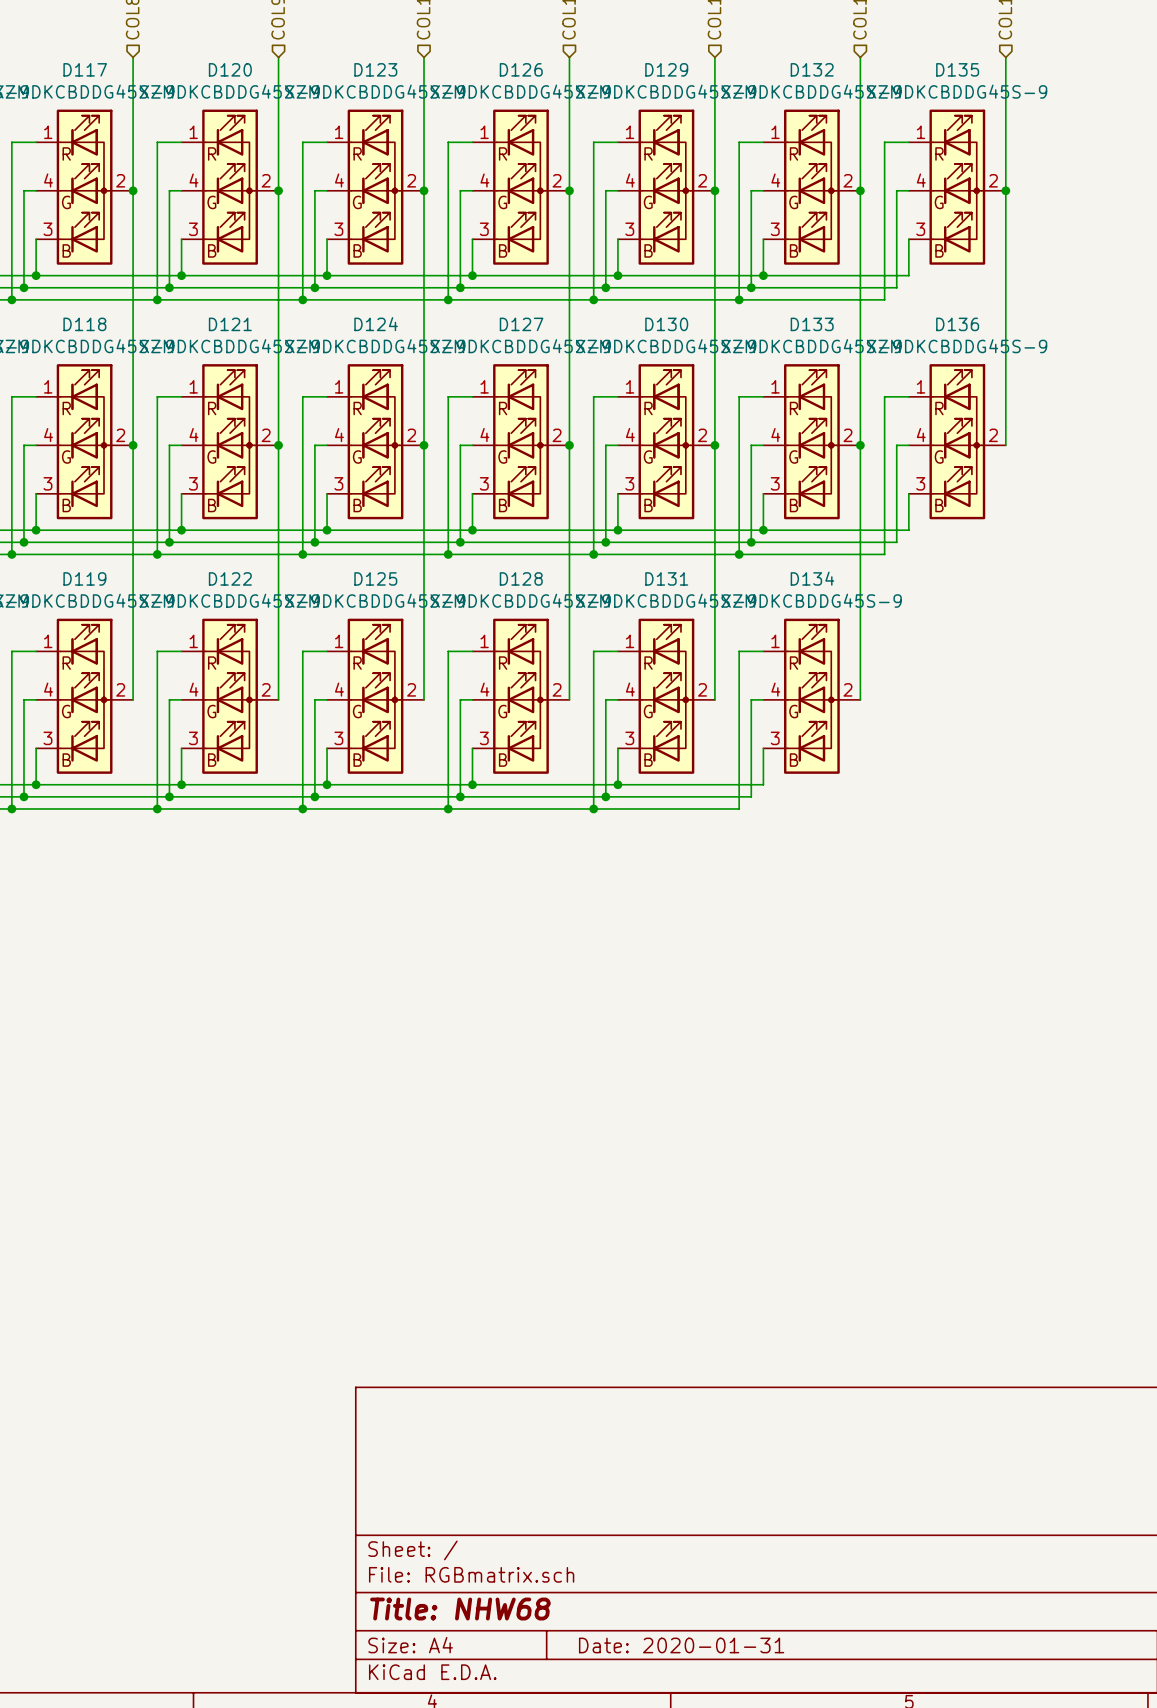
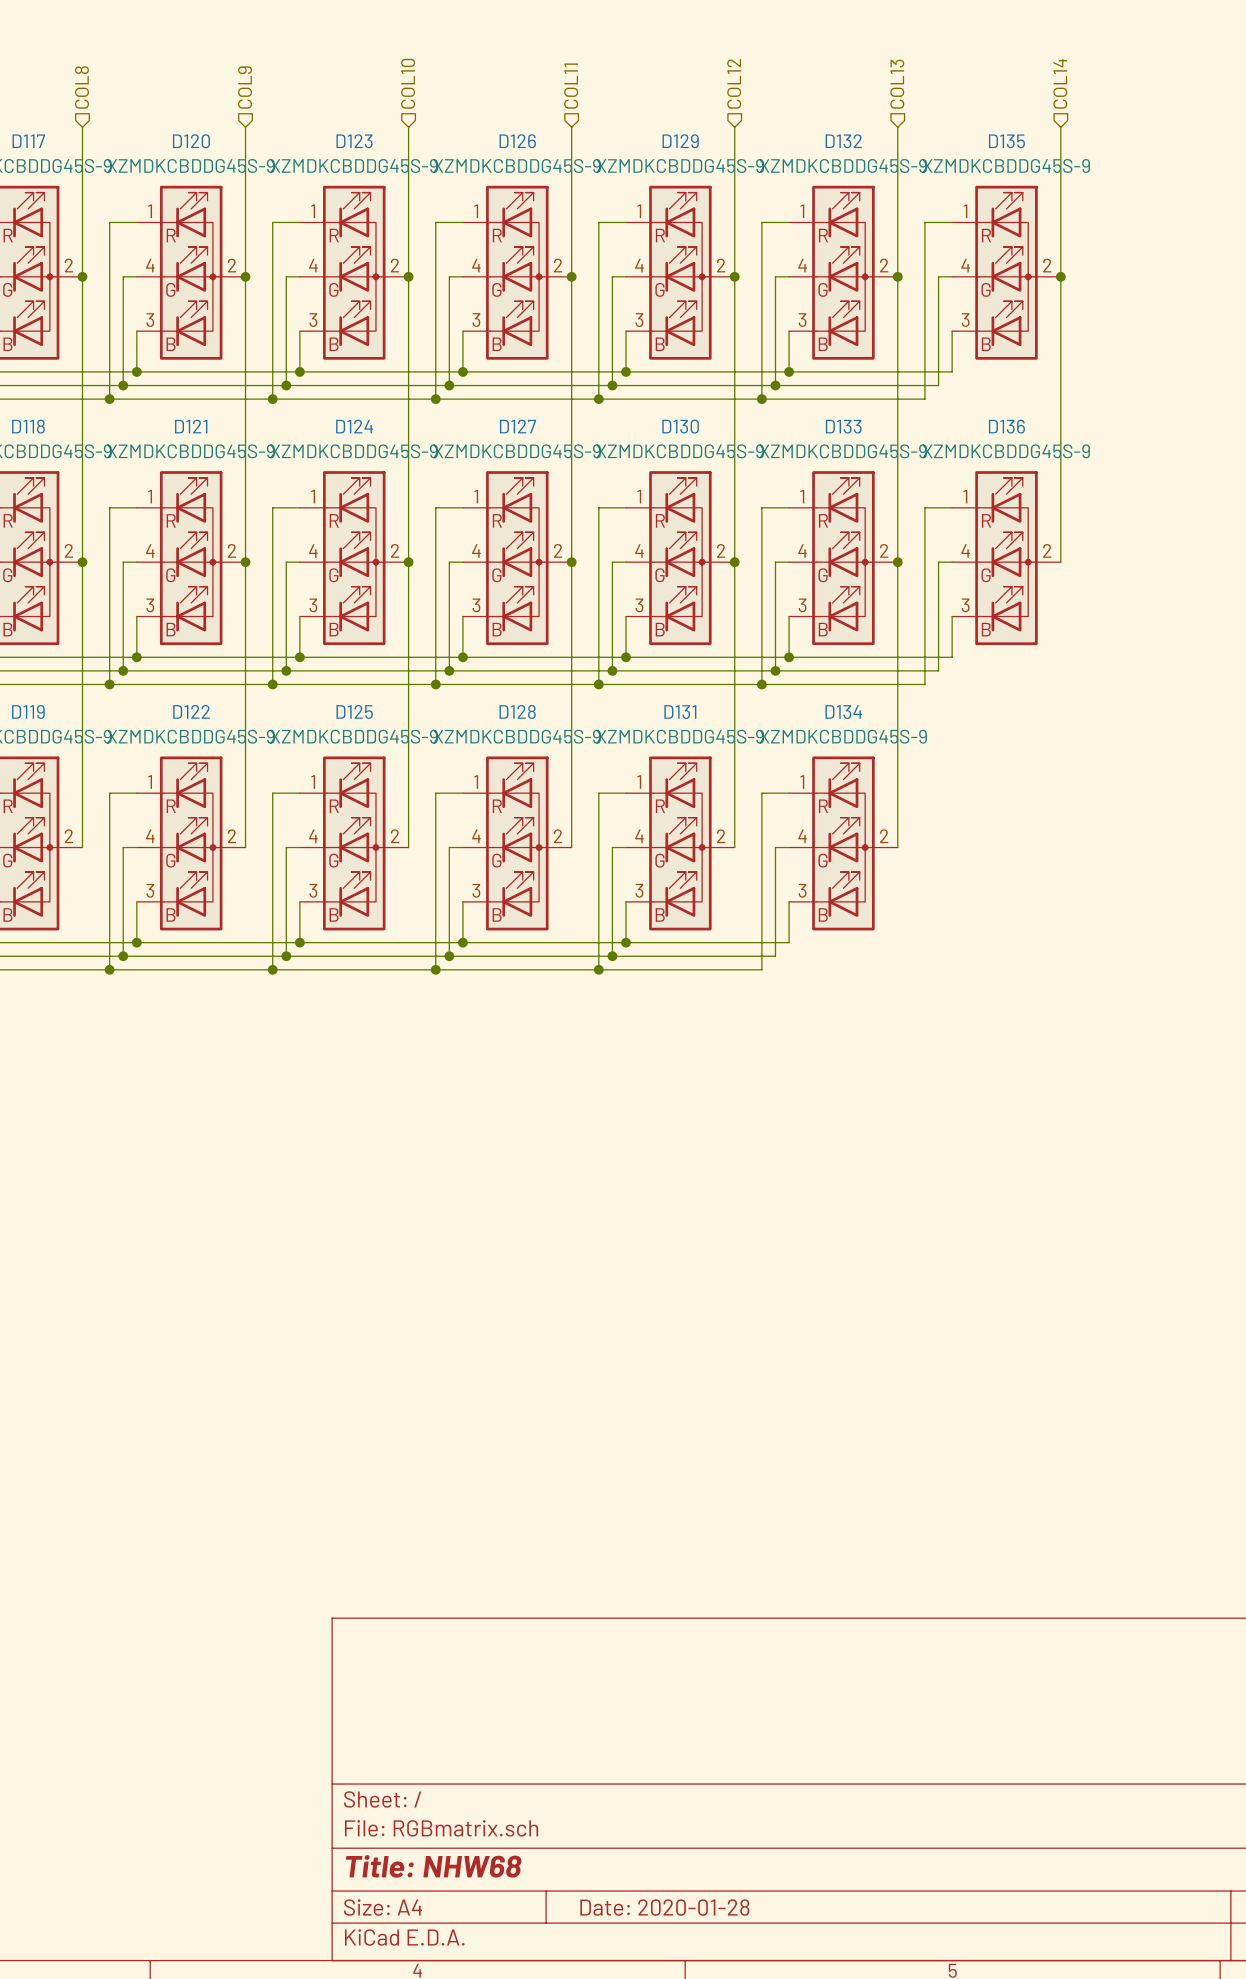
title block: Date: 2020-01-31 (681, 1645) -> Date: 2020-01-28 (664, 1907)

